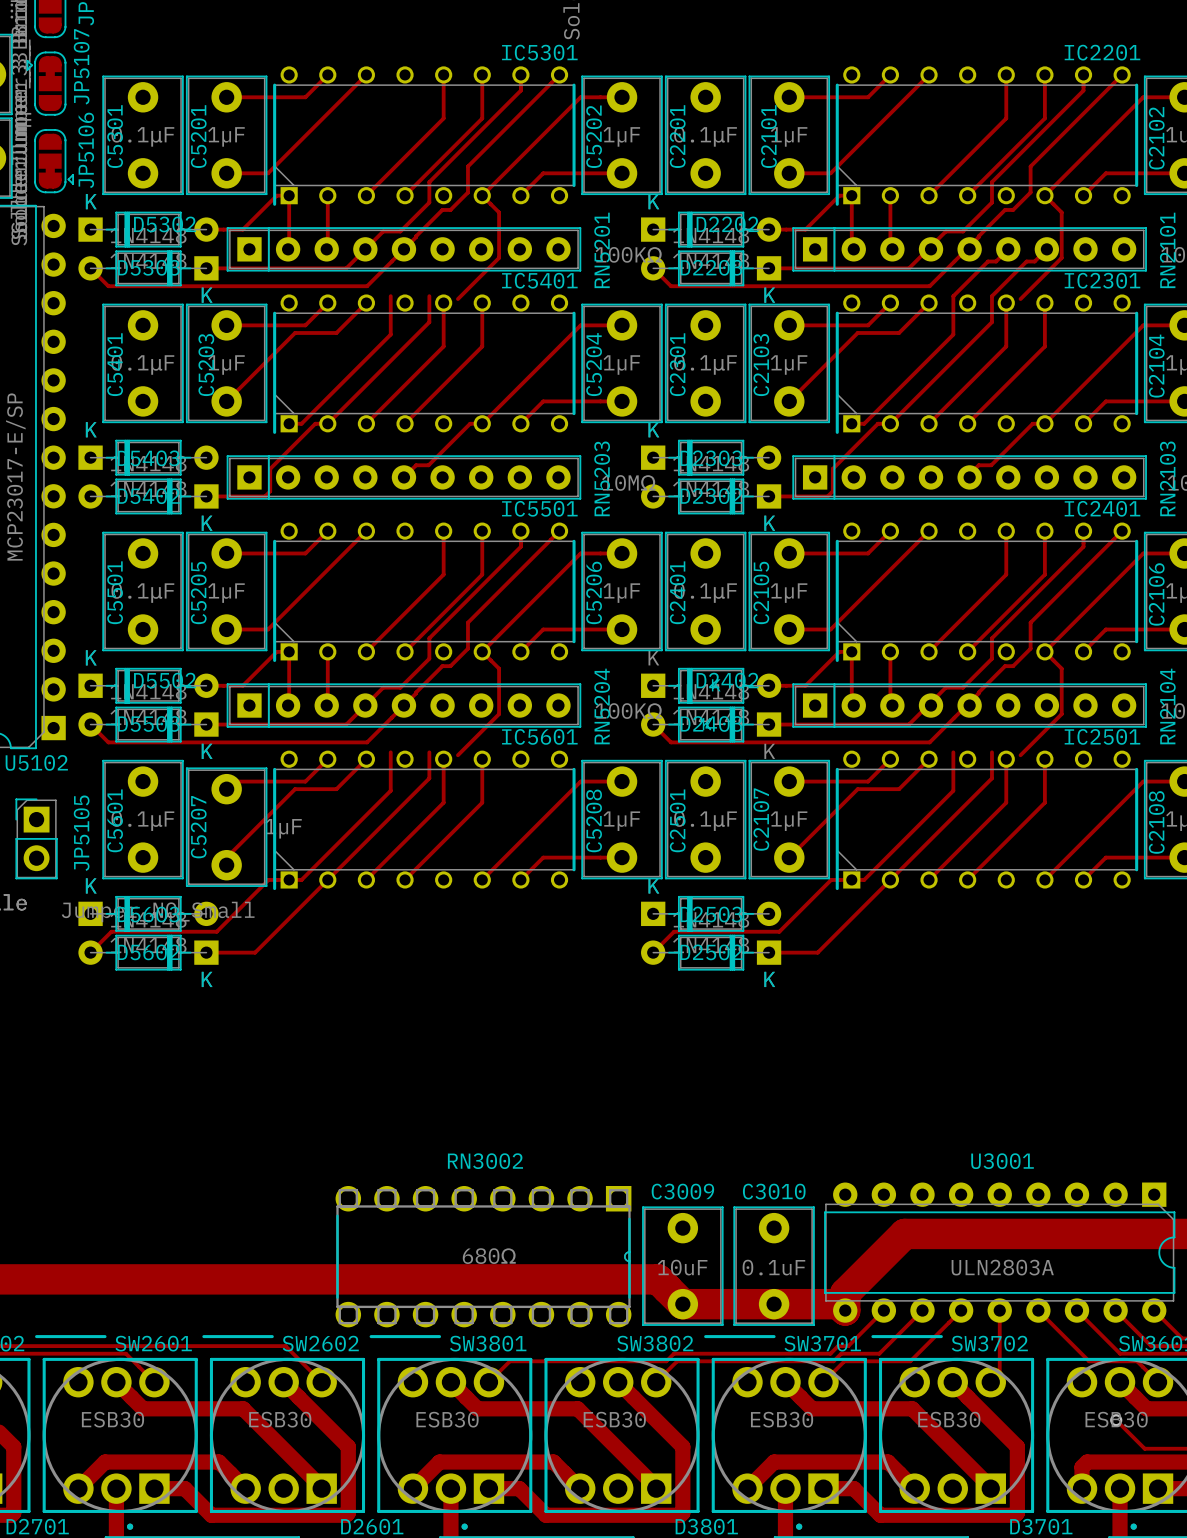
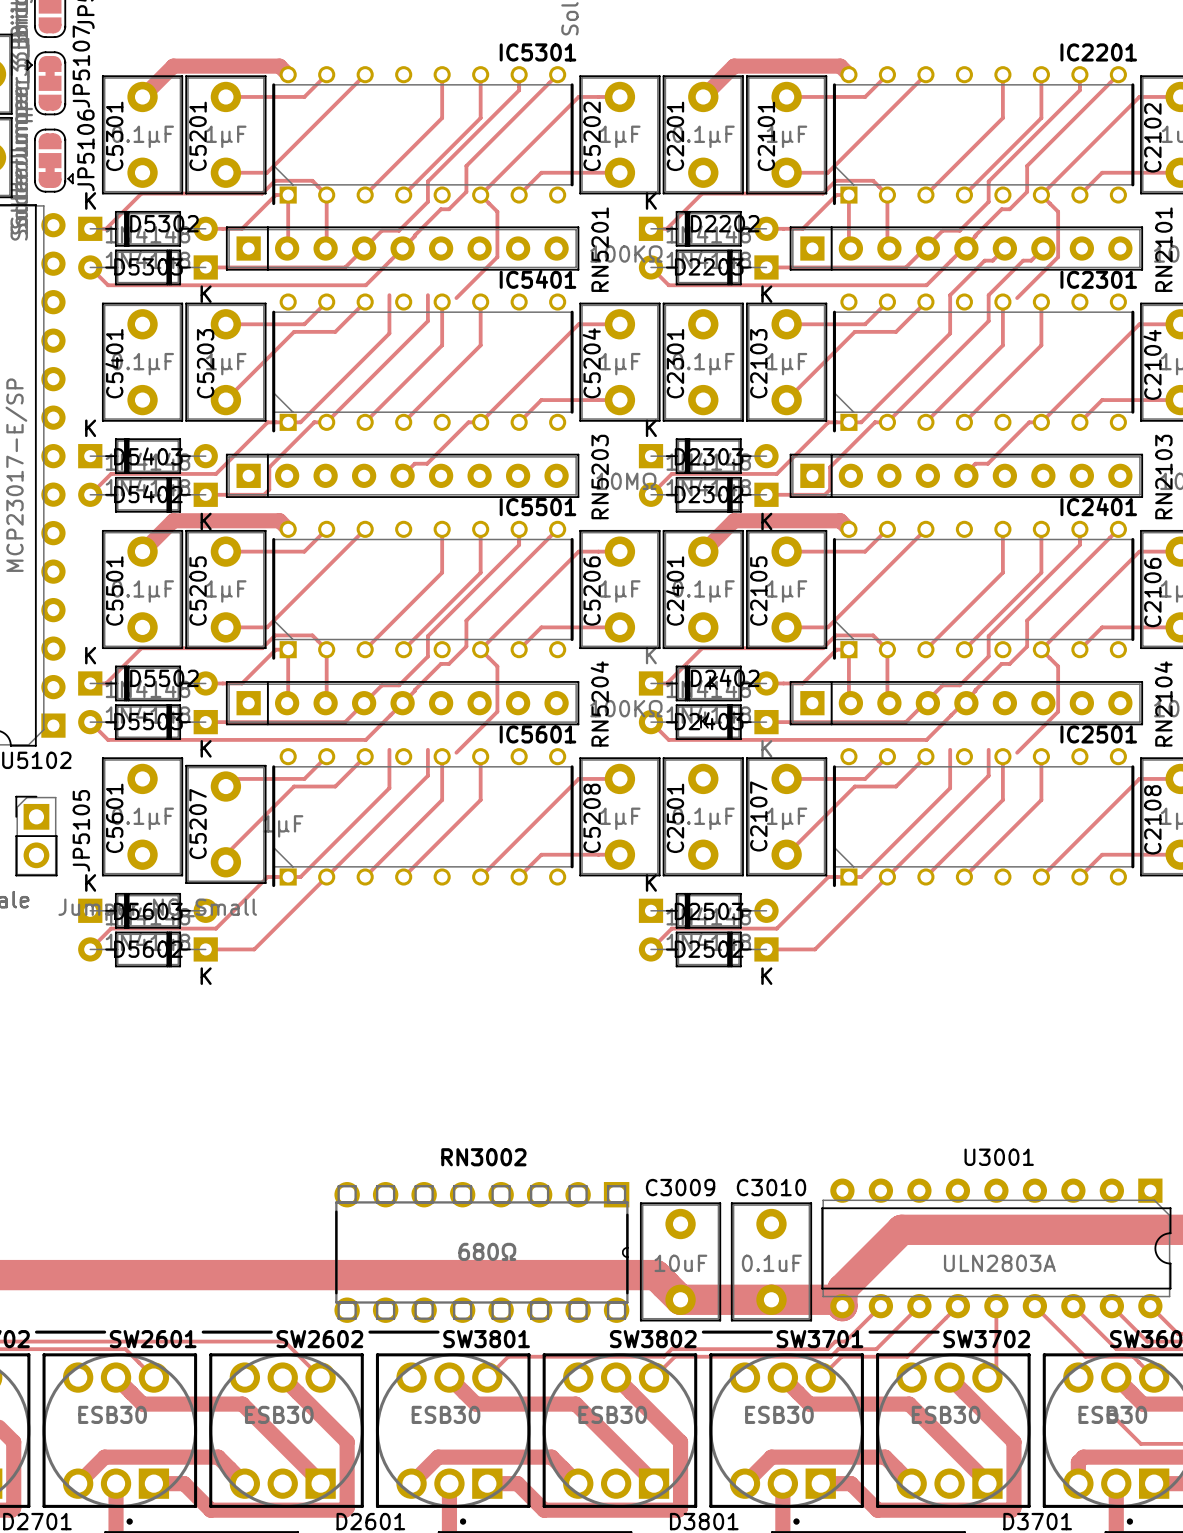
track: none -> (288, 74) (279, 66) (173, 66) (142, 96)
track: none -> (848, 74) (840, 66) (734, 66) (703, 96)
track: none -> (326, 195) (312, 180) (275, 180) (262, 193) (141, 193) (106, 228) (90, 228)
track: none -> (887, 195) (873, 180) (835, 180) (823, 193) (702, 193) (666, 228) (651, 228)
track: none -> (288, 422) (267, 422) (216, 473) (111, 473) (90, 494)
track: none -> (848, 422) (828, 422) (776, 473) (671, 473) (651, 494)
track: none -> (288, 529) (279, 520) (173, 520) (142, 551)
track: none -> (848, 529) (840, 520) (734, 520) (703, 551)
track: none -> (326, 649) (312, 635) (275, 635) (262, 648) (141, 648) (106, 683) (90, 683)
track: none -> (887, 649) (873, 635) (835, 635) (823, 648) (702, 648) (666, 683) (651, 683)

